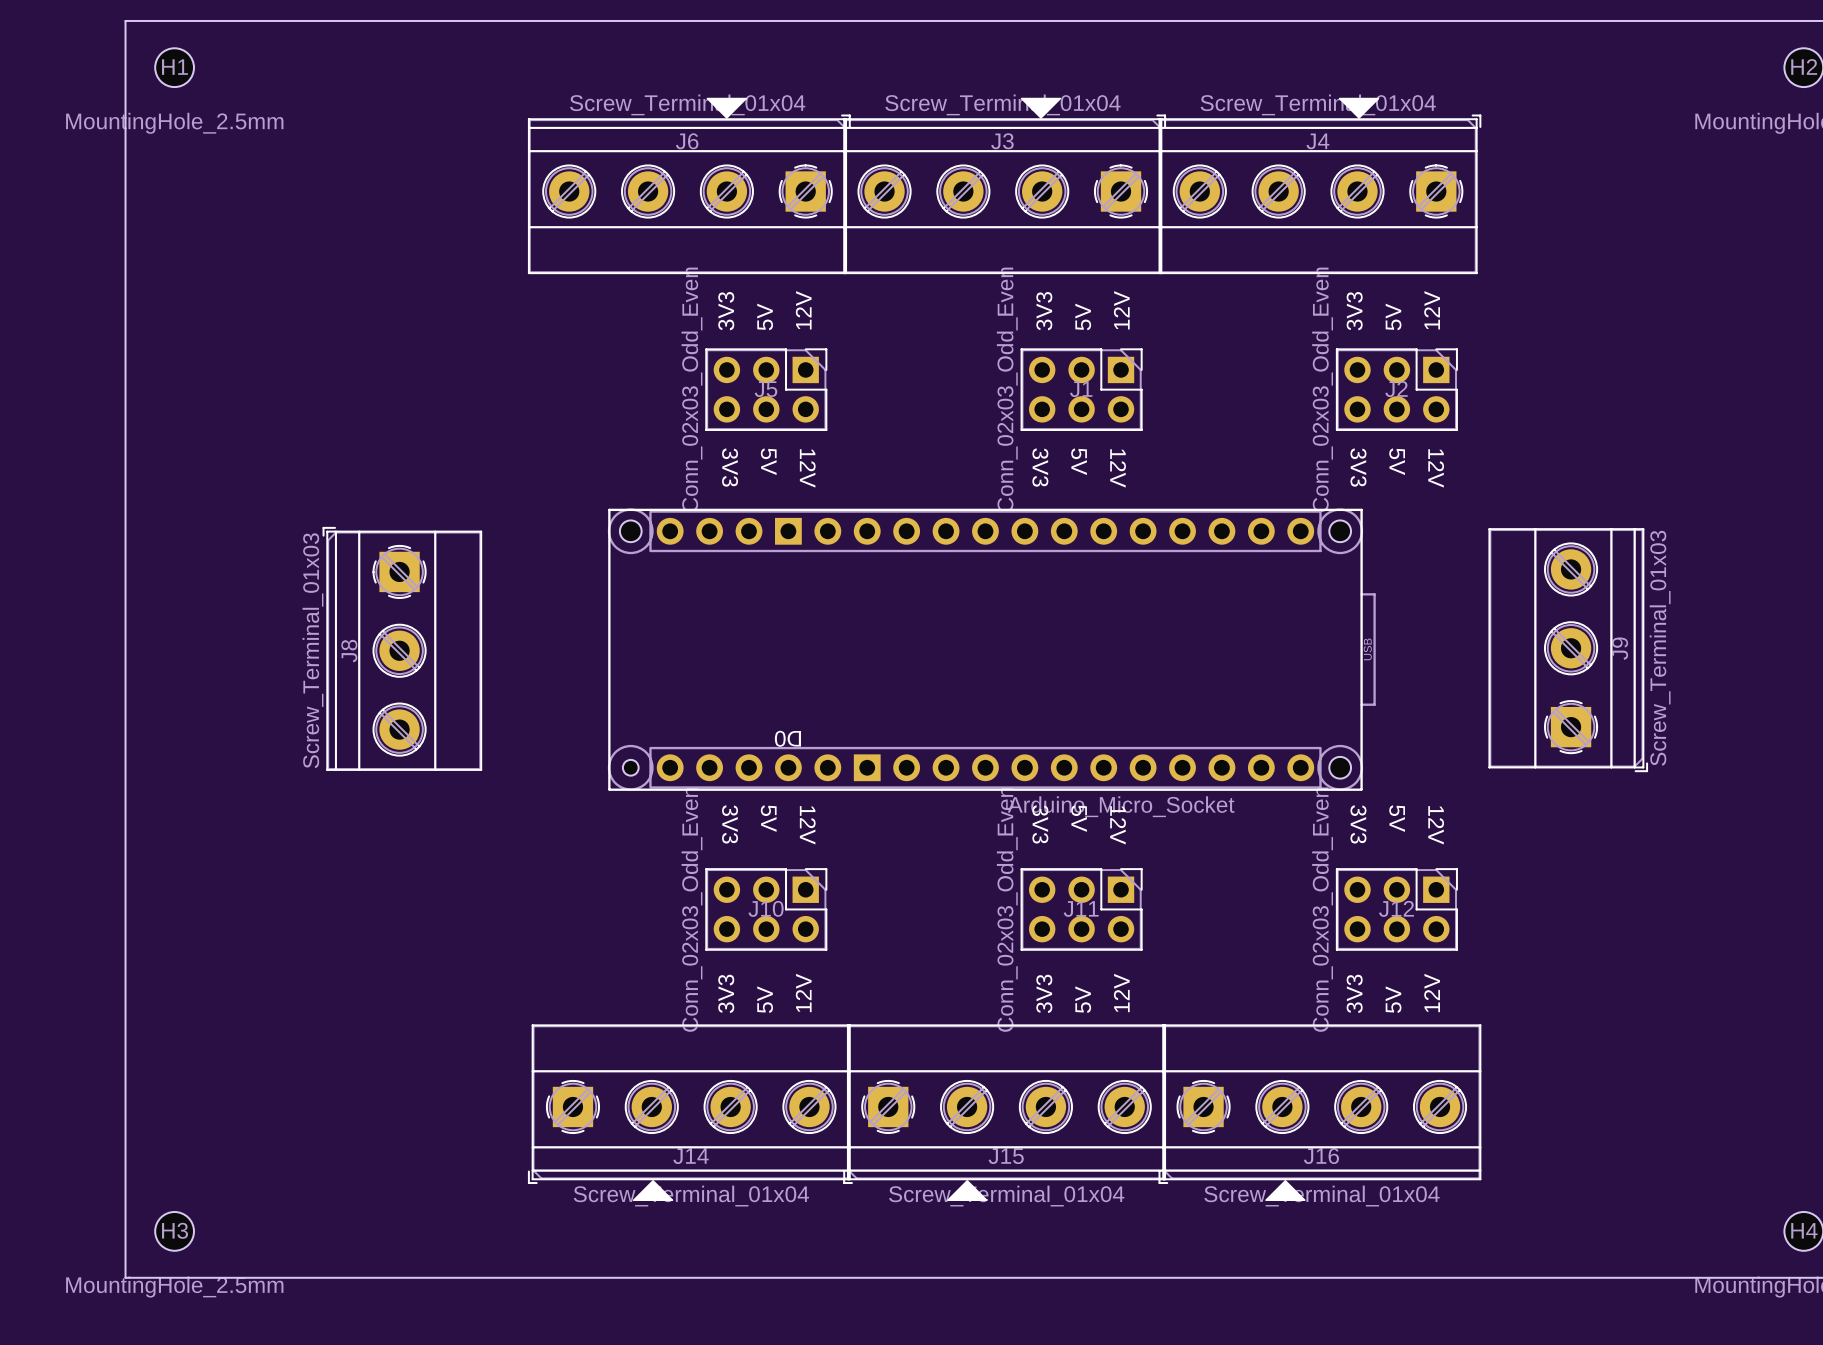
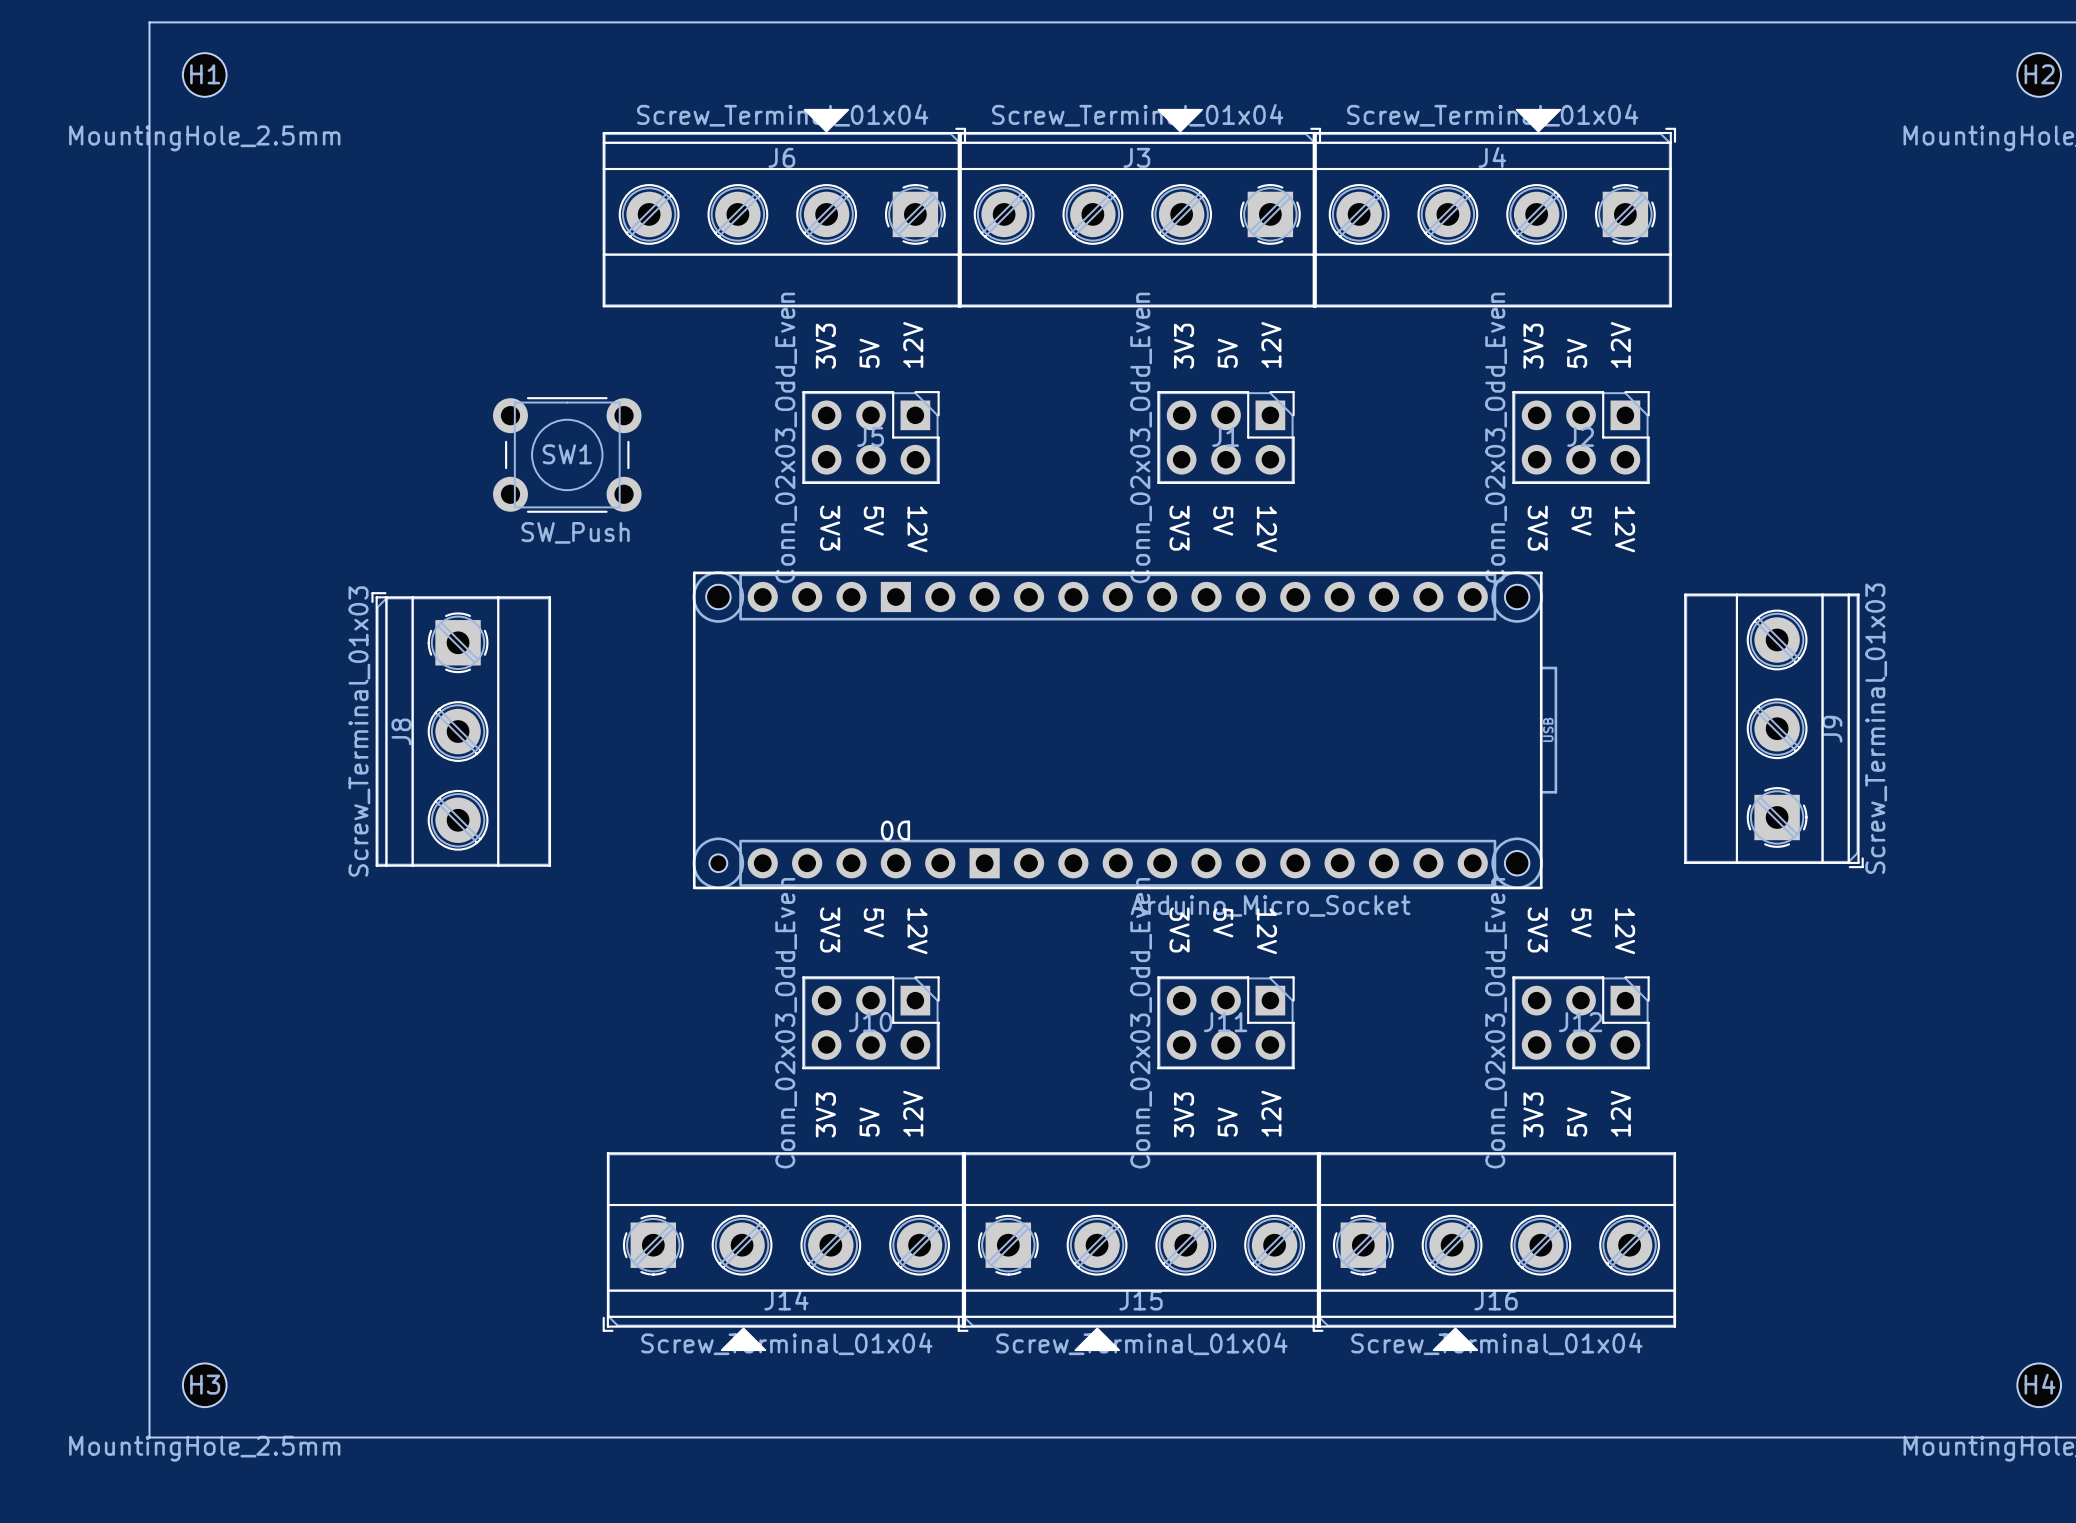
SW1: none -> SW_Push (567, 454)

